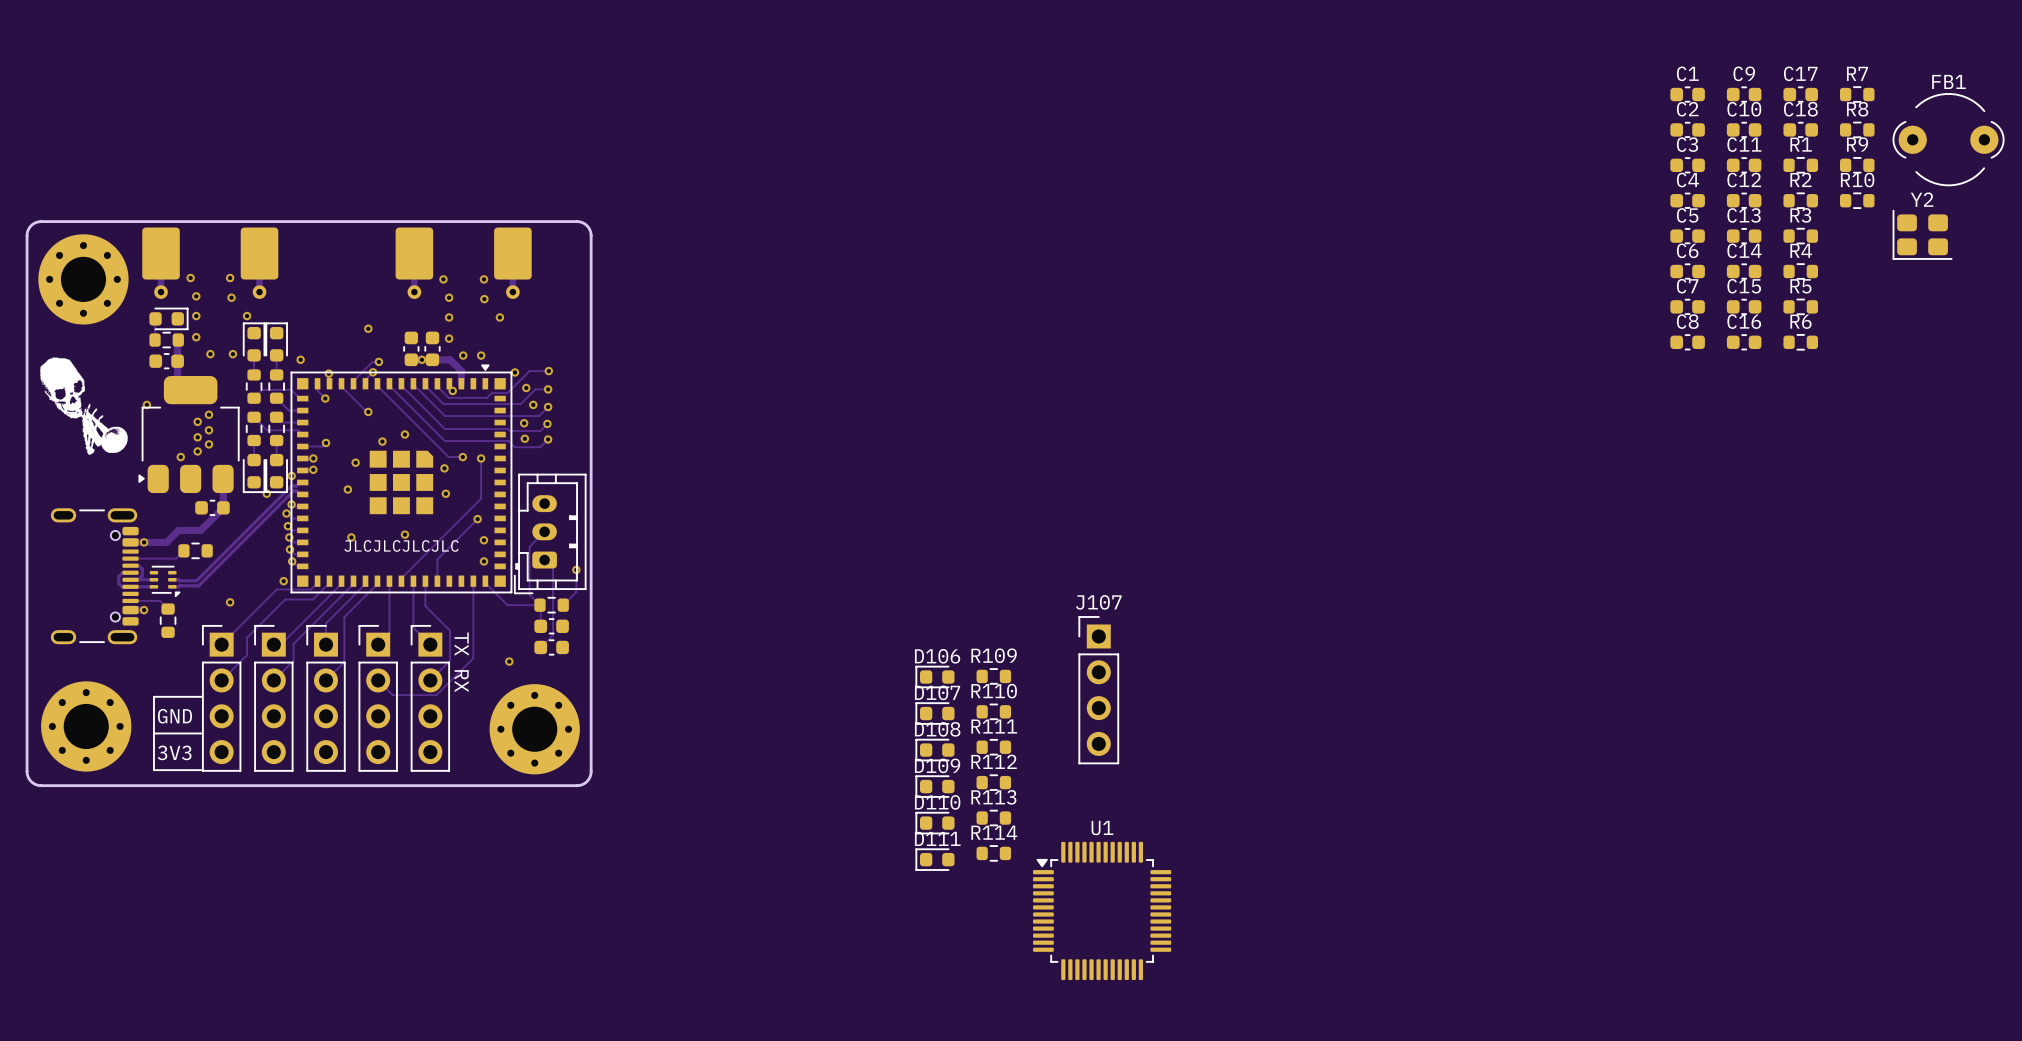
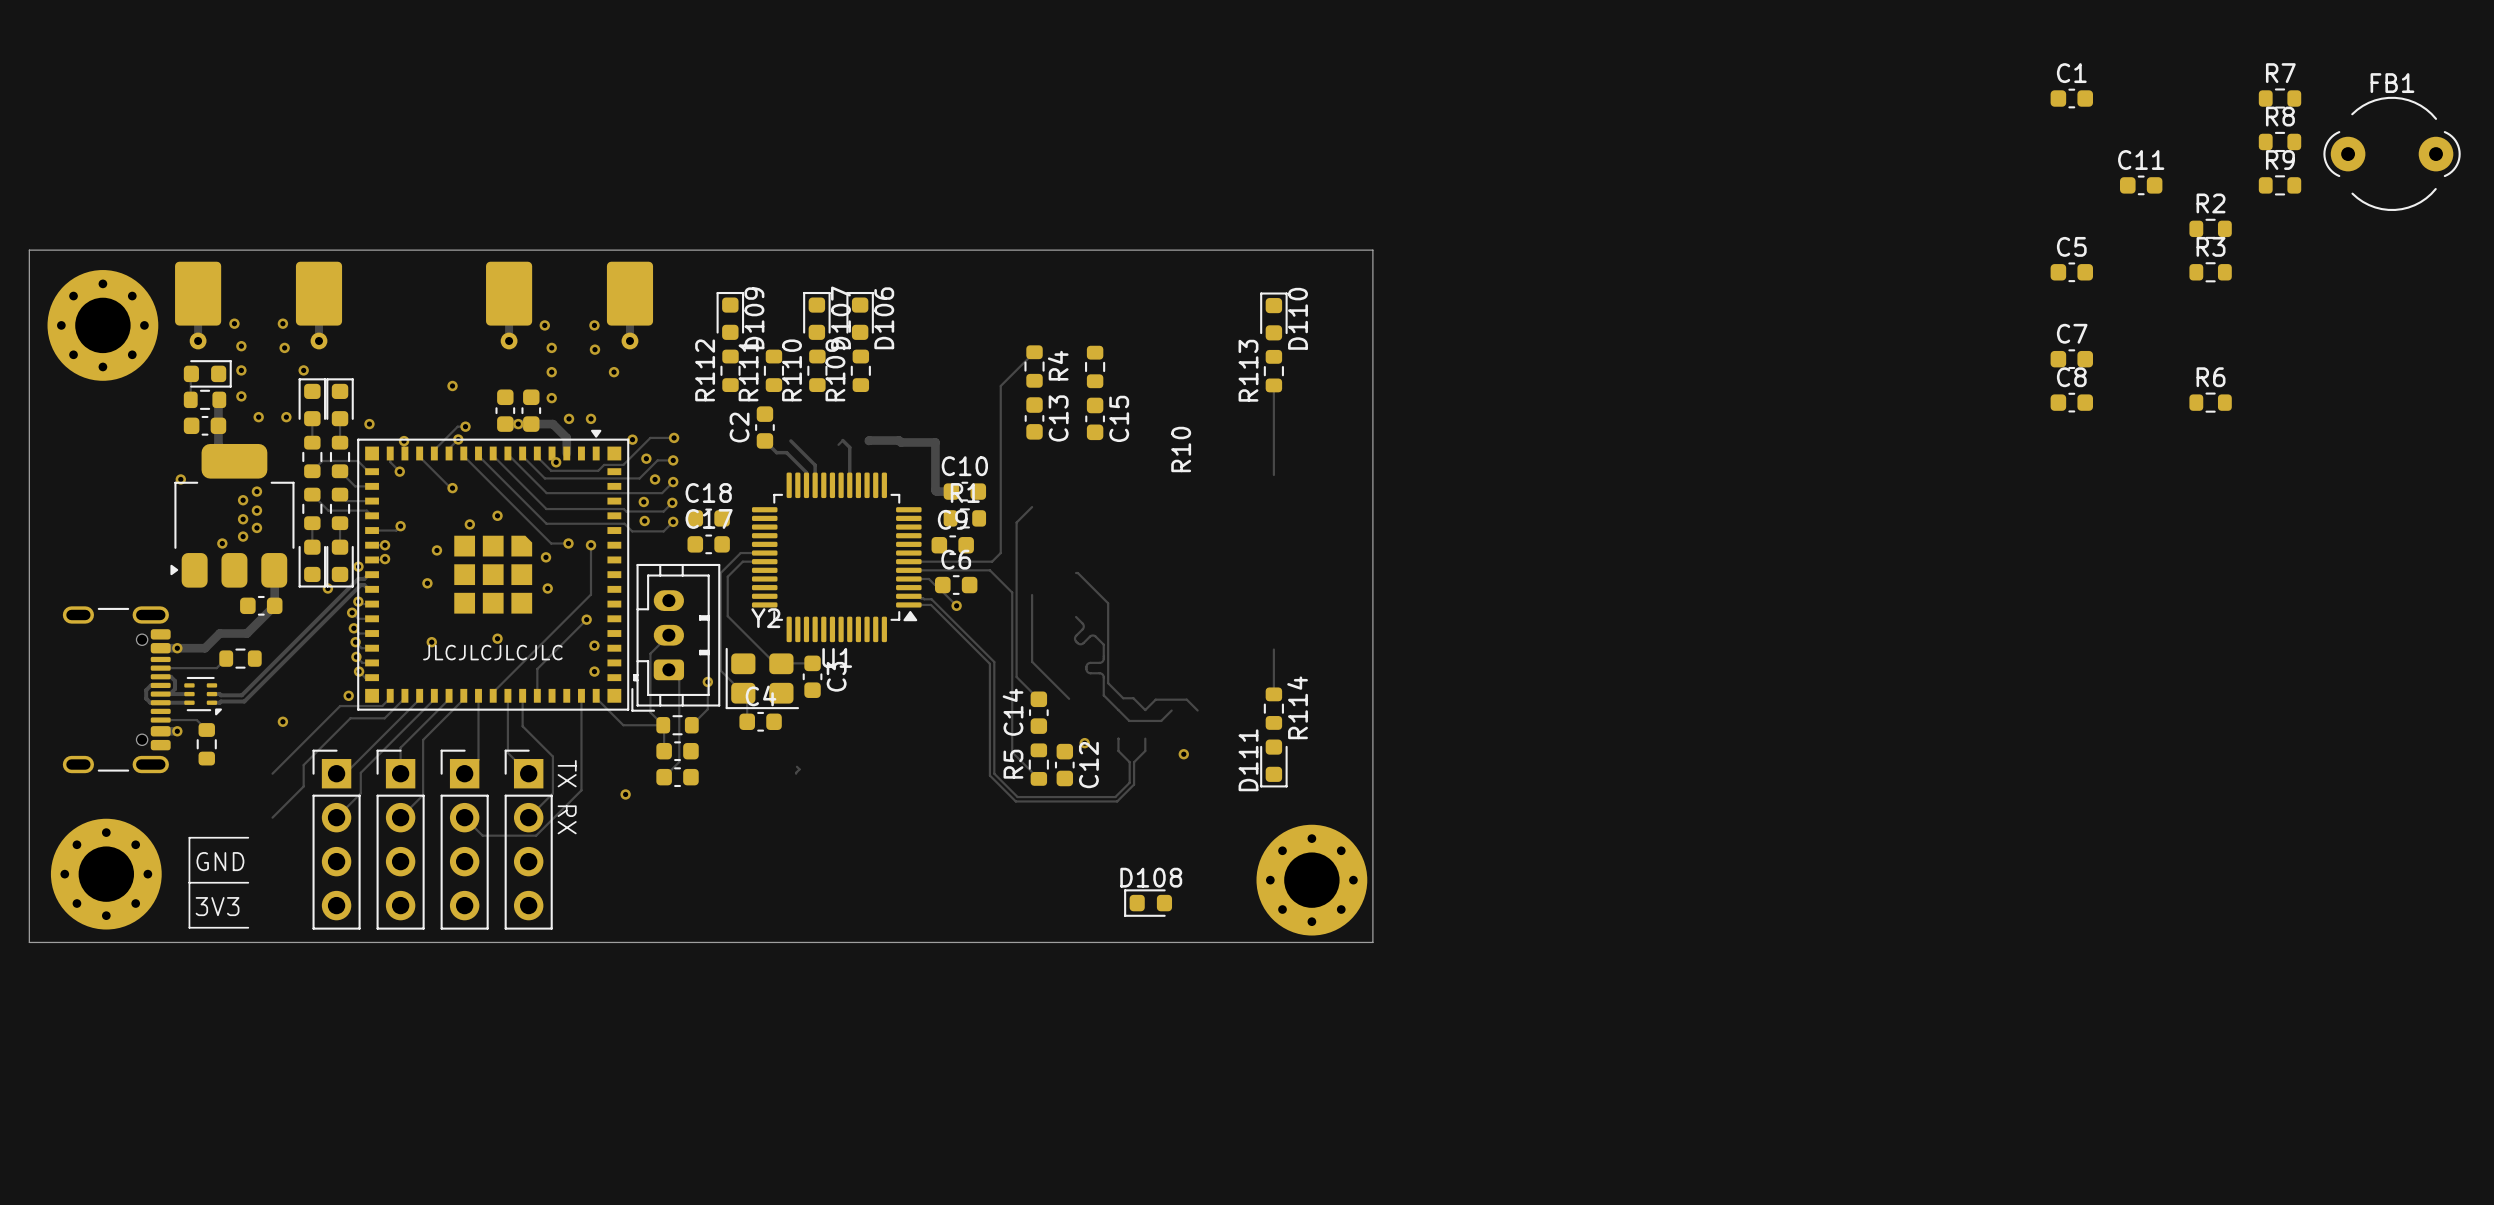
C9 position: (1744, 94) -> (952, 545)
C17 position: (1800, 94) -> (708, 544)
C2 name position: C2 (1687, 109) -> C2 (739, 427)
C2 rotation: 0° (1687, 129) -> 90° clockwise (764, 427)
C2 position: (1687, 129) -> (764, 427)
C10 position: (1744, 129) -> (964, 491)
C18 position: (1800, 129) -> (708, 518)
C3 rotation: 0° (1687, 165) -> 90° clockwise (812, 676)
C3 position: (1687, 165) -> (812, 676)
R1 position: (1800, 165) -> (964, 518)
R10 name position: R10 (1857, 180) -> R10 (1181, 449)
Y2 name position: Y2 (1922, 199) -> Y2 (765, 618)
C4 position: (1687, 200) -> (760, 721)
C12 rotation: 0° (1744, 200) -> 90° clockwise (1064, 765)
C12 position: (1744, 200) -> (1064, 765)
R10 rotation: 0° (1857, 200) -> 90° clockwise (1095, 366)
R10 position: (1857, 200) -> (1095, 366)
board edge: (41, 221) (577, 221) (587, 225) (591, 235) (591, 771) (587, 781) (577, 785) (41, 785) (31, 781) (27, 771) (27, 235) (31, 225) (41, 221) -> (29, 250) (29, 942) (1372, 942) (1372, 250) (29, 250)
Y2 position: (1922, 234) -> (762, 678)
C13 rotation: 0° (1744, 236) -> 90° clockwise (1034, 418)
C13 position: (1744, 236) -> (1034, 418)
C14 name position: C14 (1744, 250) -> C14 (1013, 712)
C6 position: (1687, 271) -> (956, 585)
C14 rotation: 0° (1744, 271) -> 90° clockwise (1038, 712)
C14 position: (1744, 271) -> (1038, 712)
R4 rotation: 0° (1800, 271) -> 90° clockwise (1034, 366)
R4 position: (1800, 271) -> (1034, 366)
R5 name position: R5 (1800, 286) -> R5 (1013, 764)
track: none -> (1034, 352) (1000, 386) (1000, 553) (992, 561) (908, 561)
C15 rotation: 0° (1744, 306) -> 90° clockwise (1095, 418)
C15 position: (1744, 306) -> (1095, 418)
R5 rotation: 0° (1800, 306) -> 90° clockwise (1038, 764)
R5 position: (1800, 306) -> (1038, 764)
track: none -> (1273, 385) (1273, 474)
C16: (1744, 342) -> none
drawing: [39, 357, 128, 455] -> none
track: none -> (764, 440) (776, 452) (786, 452) (806, 472) (806, 485)
track: none -> (790, 440) (815, 465) (815, 485)
track: none -> (868, 440) (935, 442) (935, 490) (951, 491) (949, 493) (933, 493)
track: none -> (838, 444) (842, 440) (849, 447) (849, 485)
track: none -> (1032, 507) (1016, 522) (1016, 677) (1038, 699)
track: none -> (764, 553) (740, 553) (720, 572) (720, 670) (747, 697) (747, 721)
track: none -> (764, 561) (742, 561) (727, 576) (727, 616) (775, 663) (812, 663)
track: none -> (908, 570) (989, 570) (1012, 592) (1012, 752) (1038, 778)
track: none -> (1076, 573) (1108, 603) (1108, 683) (1123, 698) (1133, 698) (1145, 710) (1155, 699) (1186, 699) (1197, 710)
track: none -> (908, 578) (928, 578) (935, 585) (942, 585) (942, 591) (956, 605)
track: none -> (1032, 594) (1032, 661) (1069, 698)
track: none -> (908, 596) (931, 599) (994, 662) (994, 773) (1017, 797) (1115, 797) (1129, 782) (1129, 762) (1118, 750) (1118, 739)
track: none -> (908, 604) (931, 604) (989, 663) (989, 775) (1015, 801) (1117, 801) (1134, 784) (1134, 762) (1145, 750) (1145, 738)
via: none -> (956, 605)
track: none -> (1076, 616) (1083, 626) (1075, 636) (1076, 641) (1081, 644) (1093, 635) (1103, 644) (1103, 660) (1088, 663) (1086, 670) (1089, 673) (1102, 674) (1103, 695) (1129, 720) (1161, 720) (1171, 710)
track: none -> (1273, 649) (1273, 694)
via: none -> (1084, 743)
via: none -> (1183, 754)
track: none -> (796, 766) (799, 769) (796, 773)
R109 name position: R109 (994, 655) -> R109 (835, 370)
R109 rotation: 0° (993, 676) -> 90° clockwise (860, 370)
R109 position: (993, 676) -> (860, 370)
D106 rotation: 0° (935, 677) -> 90° clockwise (860, 315)
D106 position: (935, 677) -> (860, 315)
J107: (1098, 690) -> none
R110 name position: R110 (994, 691) -> R110 (791, 370)
part: (221, 698) -> none
R110 rotation: 0° (993, 711) -> 90° clockwise (817, 370)
R110 position: (993, 711) -> (817, 370)
D107 rotation: 0° (935, 713) -> 90° clockwise (816, 315)
D107 position: (935, 713) -> (816, 315)
R111 name position: R111 (994, 726) -> R111 (748, 370)
part: (534, 729) -> none
part: none -> (1311, 880)
R111 rotation: 0° (993, 747) -> 90° clockwise (773, 370)
R111 position: (993, 747) -> (773, 370)
R112 name position: R112 (994, 761) -> R112 (705, 370)
R112 rotation: 0° (993, 782) -> 90° clockwise (730, 370)
R112 position: (993, 782) -> (730, 370)
D109 rotation: 0° (935, 786) -> 90° clockwise (730, 315)
D109 position: (935, 786) -> (730, 315)
R113 name position: R113 (993, 797) -> R113 (1248, 370)
R113 rotation: 0° (993, 818) -> 90° clockwise (1273, 371)
R113 position: (993, 818) -> (1273, 371)
D110 rotation: 0° (935, 823) -> 90° clockwise (1273, 316)
D110 position: (935, 823) -> (1273, 316)
R114 rotation: 0° (993, 853) -> 90° clockwise (1273, 708)
R114 position: (993, 853) -> (1273, 708)
D111 rotation: 0° (935, 859) -> 90° counterclockwise (1273, 763)
D111 position: (935, 859) -> (1273, 763)
U1 rotation: 0° (1102, 910) -> 180° (836, 557)
U1 position: (1102, 910) -> (836, 557)

